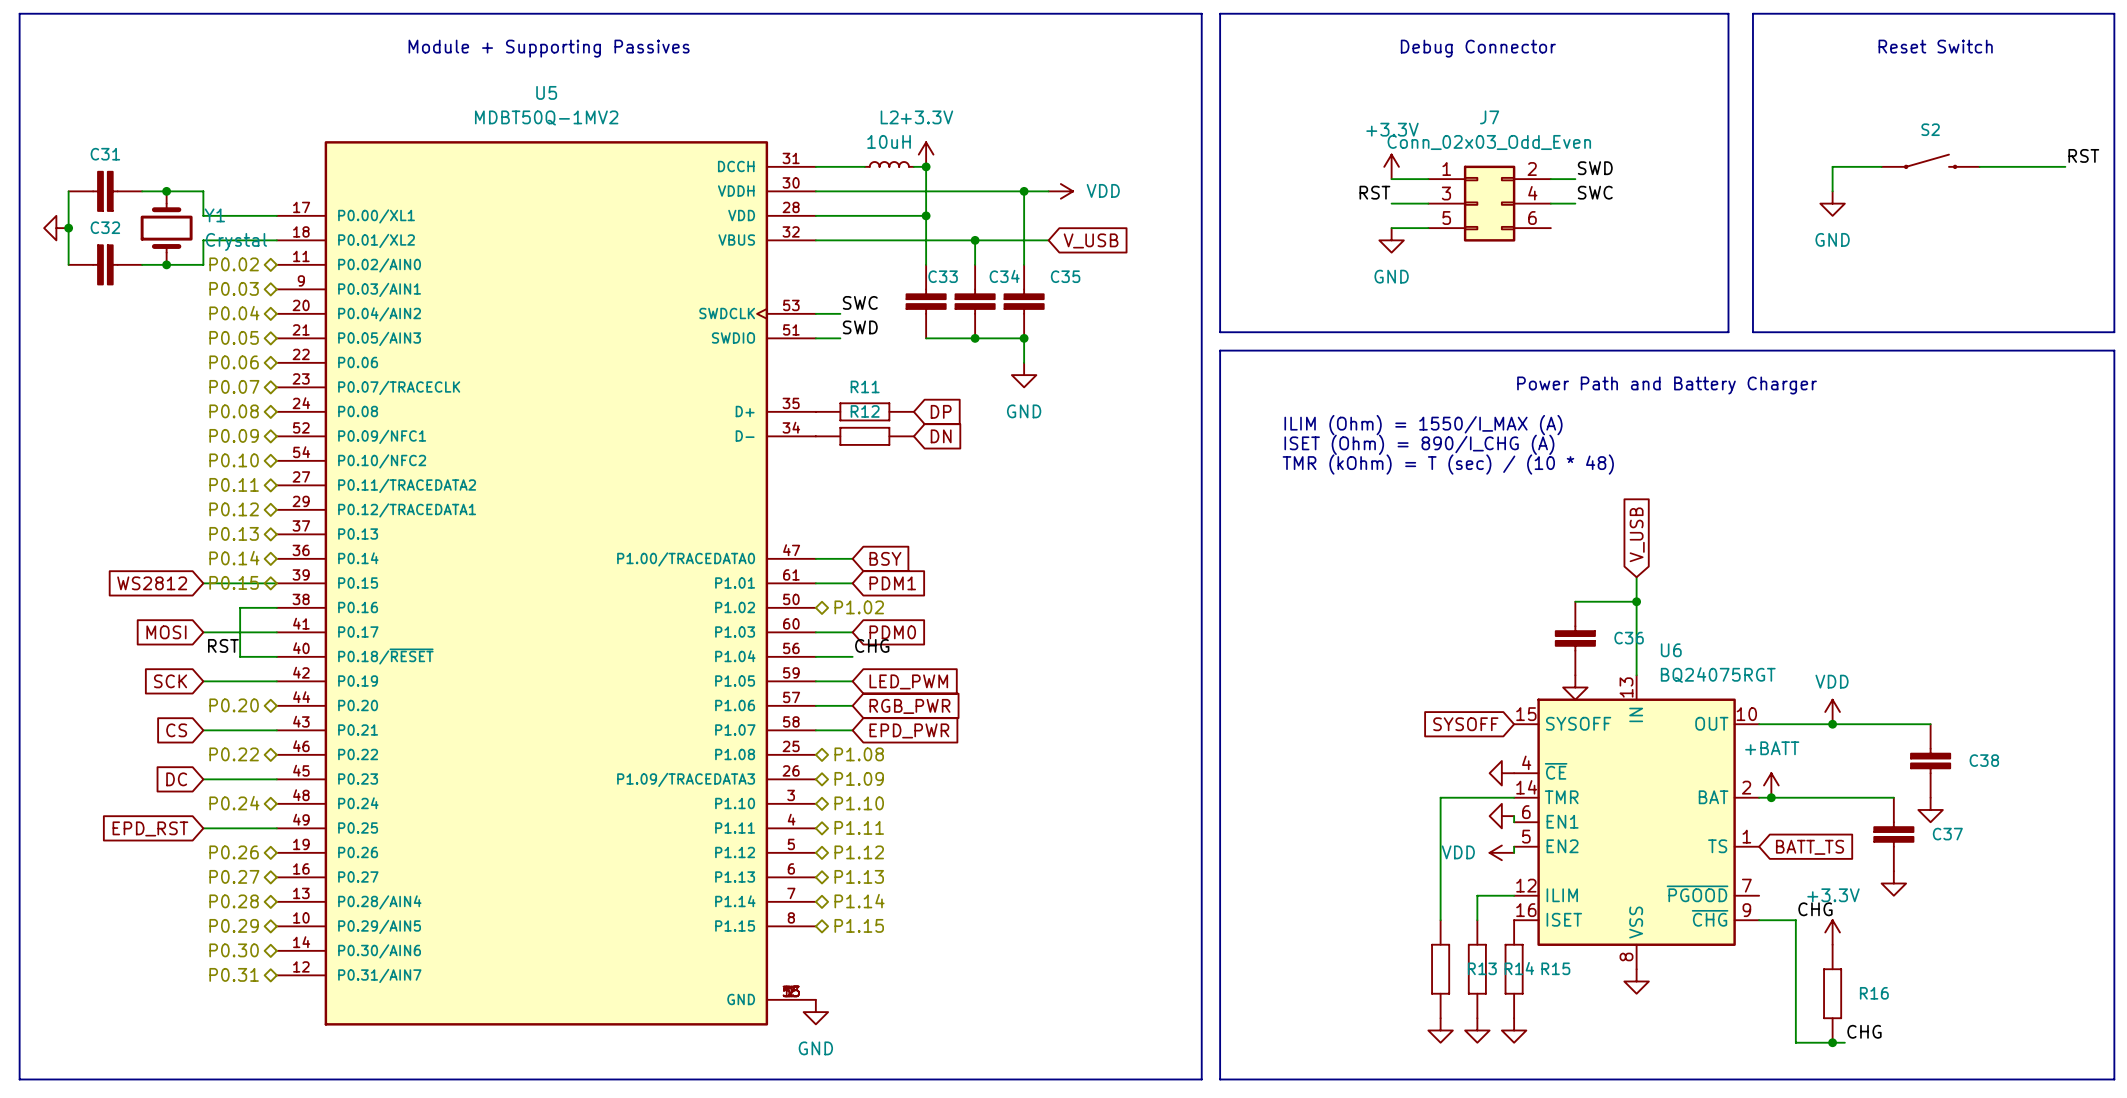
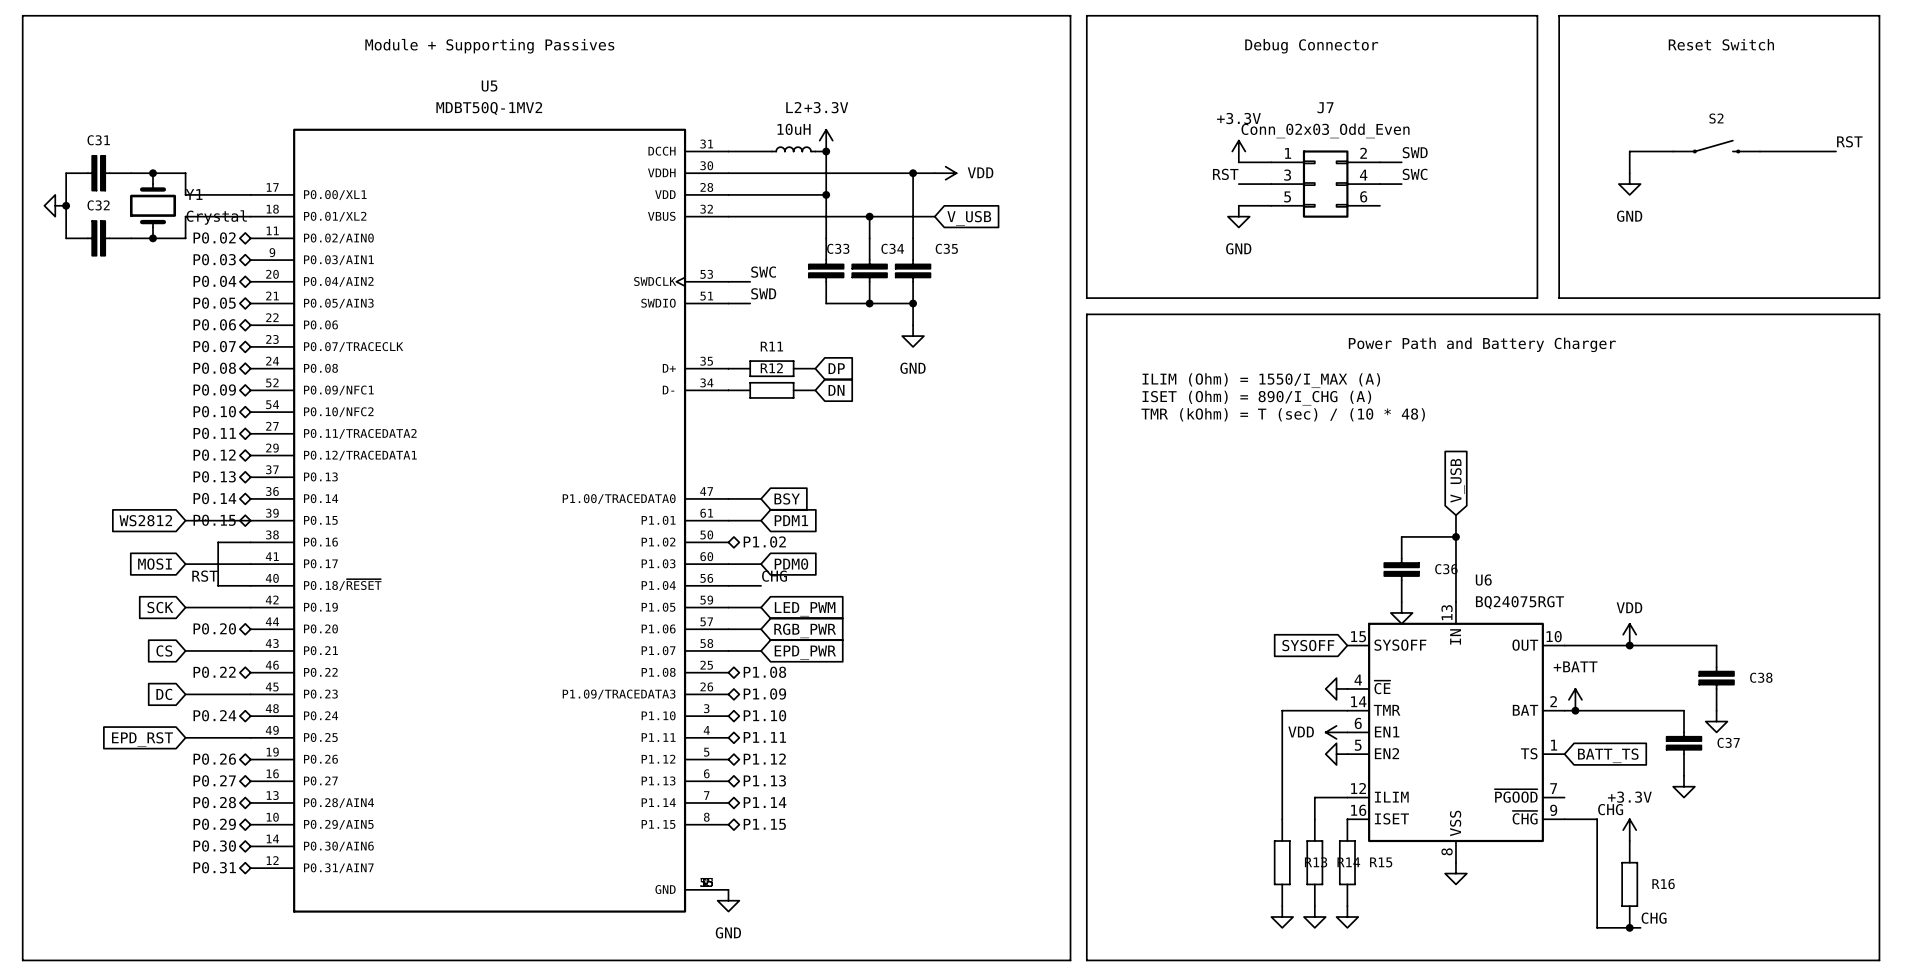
power symbol shape: [1489, 803, 1515, 829] -> [1325, 725, 1348, 739]
wire: (1514, 816) (1514, 822) -> none
power symbol text: none -> VDD (1301, 732)
power symbol shape: [1489, 845, 1515, 861] -> [1325, 743, 1348, 765]
wire: (1514, 846) (1514, 852) -> none
power symbol text: VDD (1458, 852) -> none

